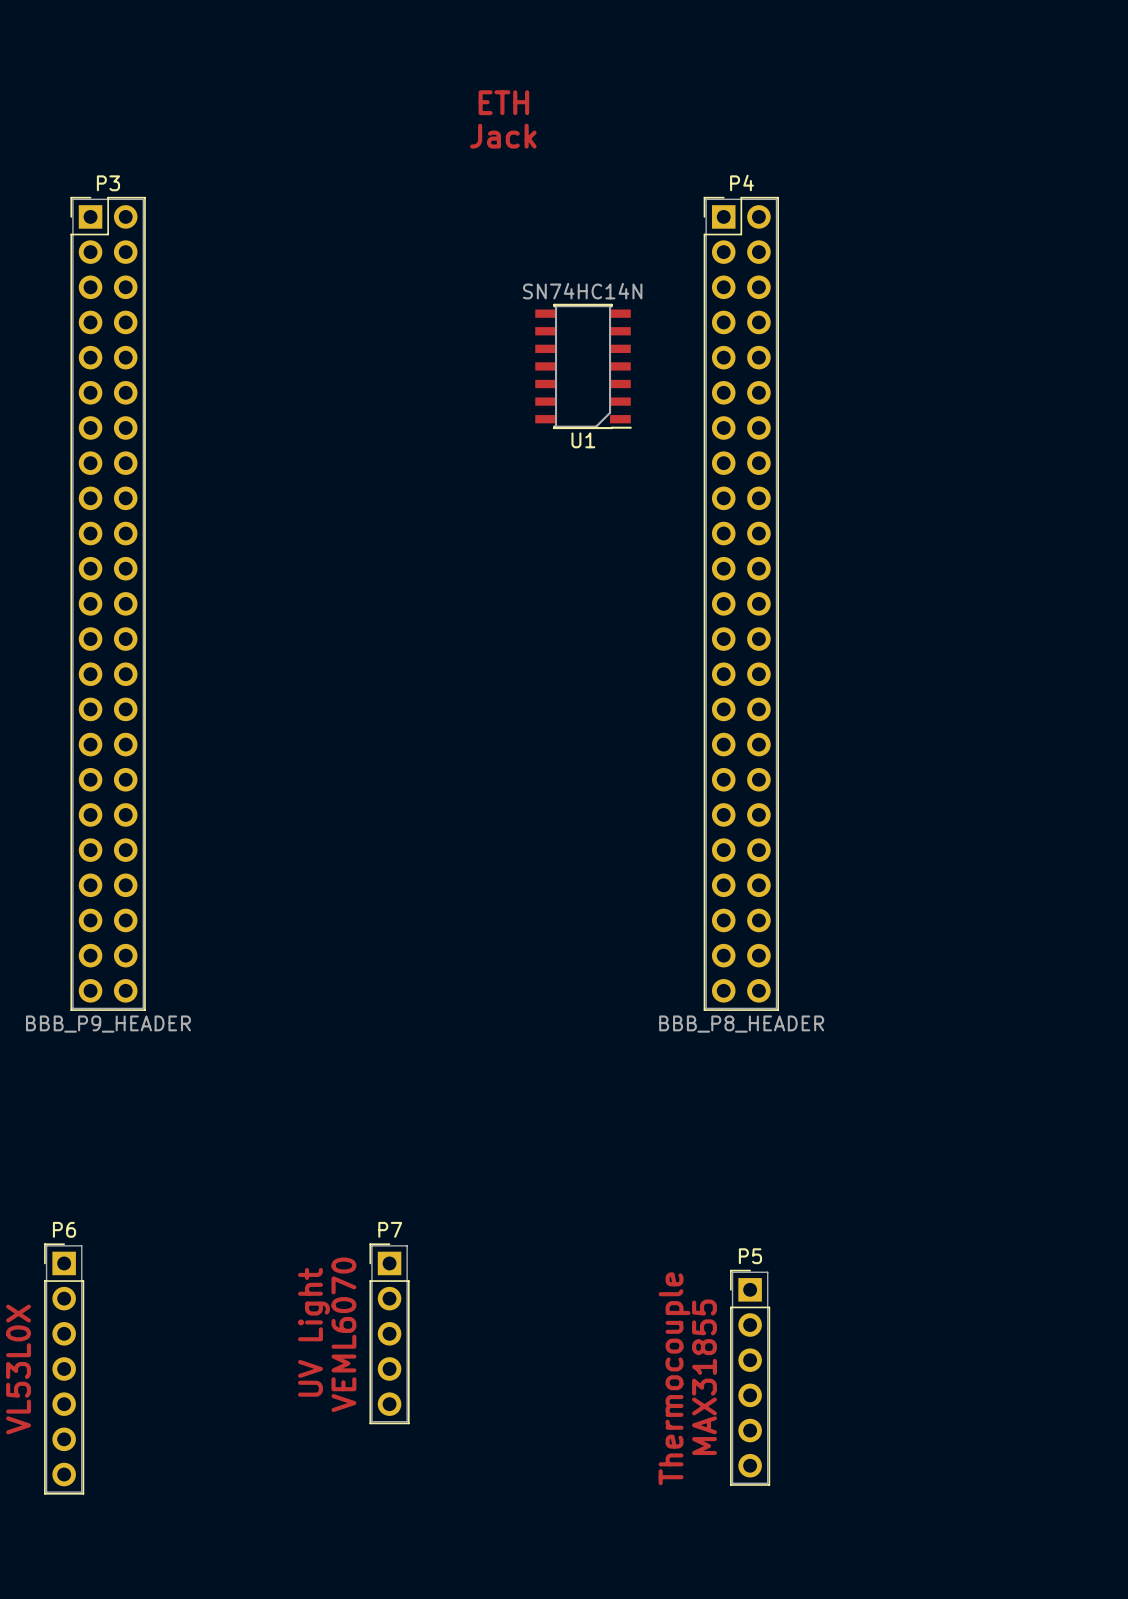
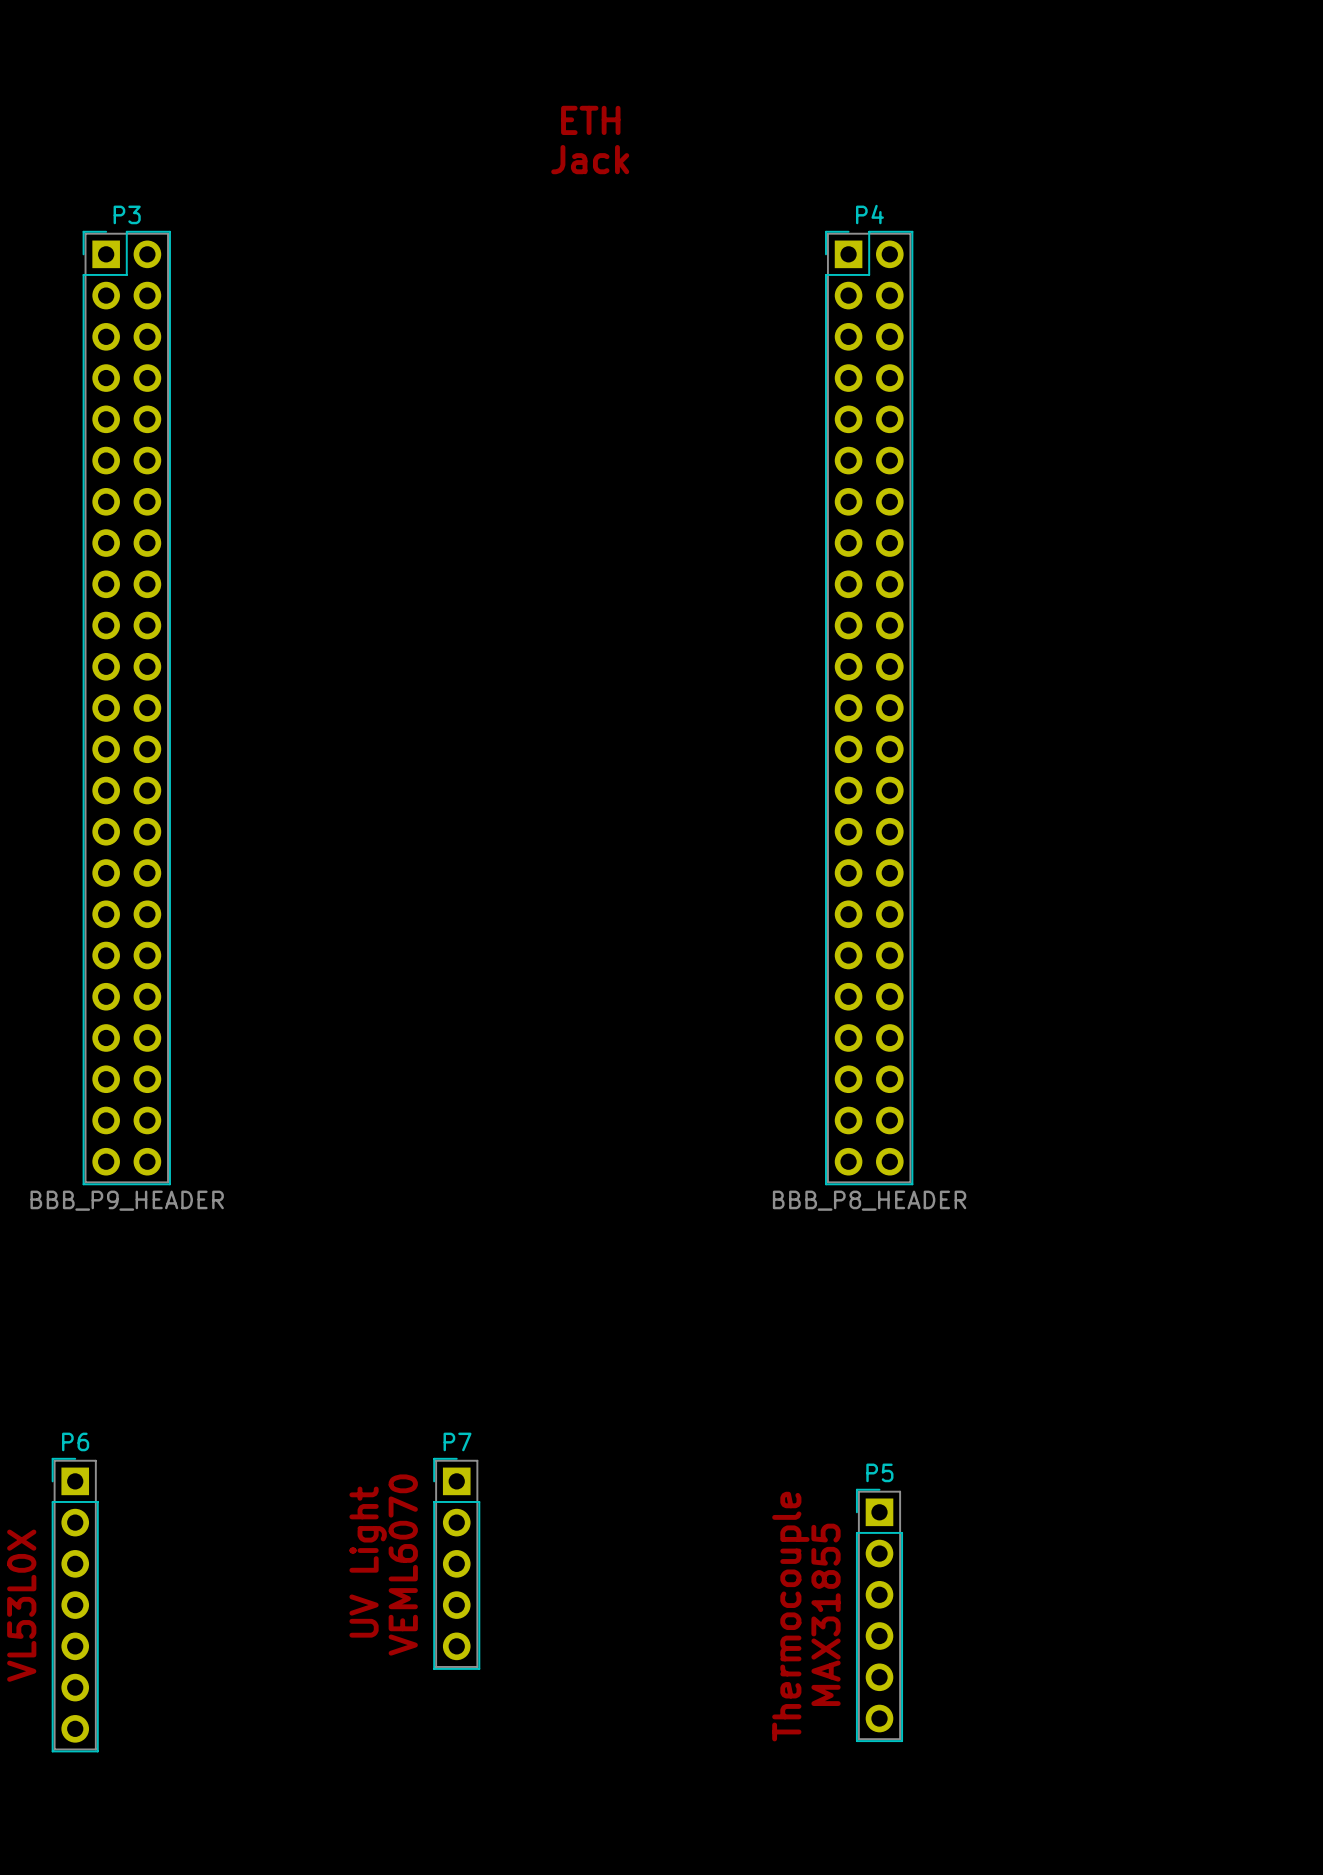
U1: SN74HC14N (583, 366) -> none

